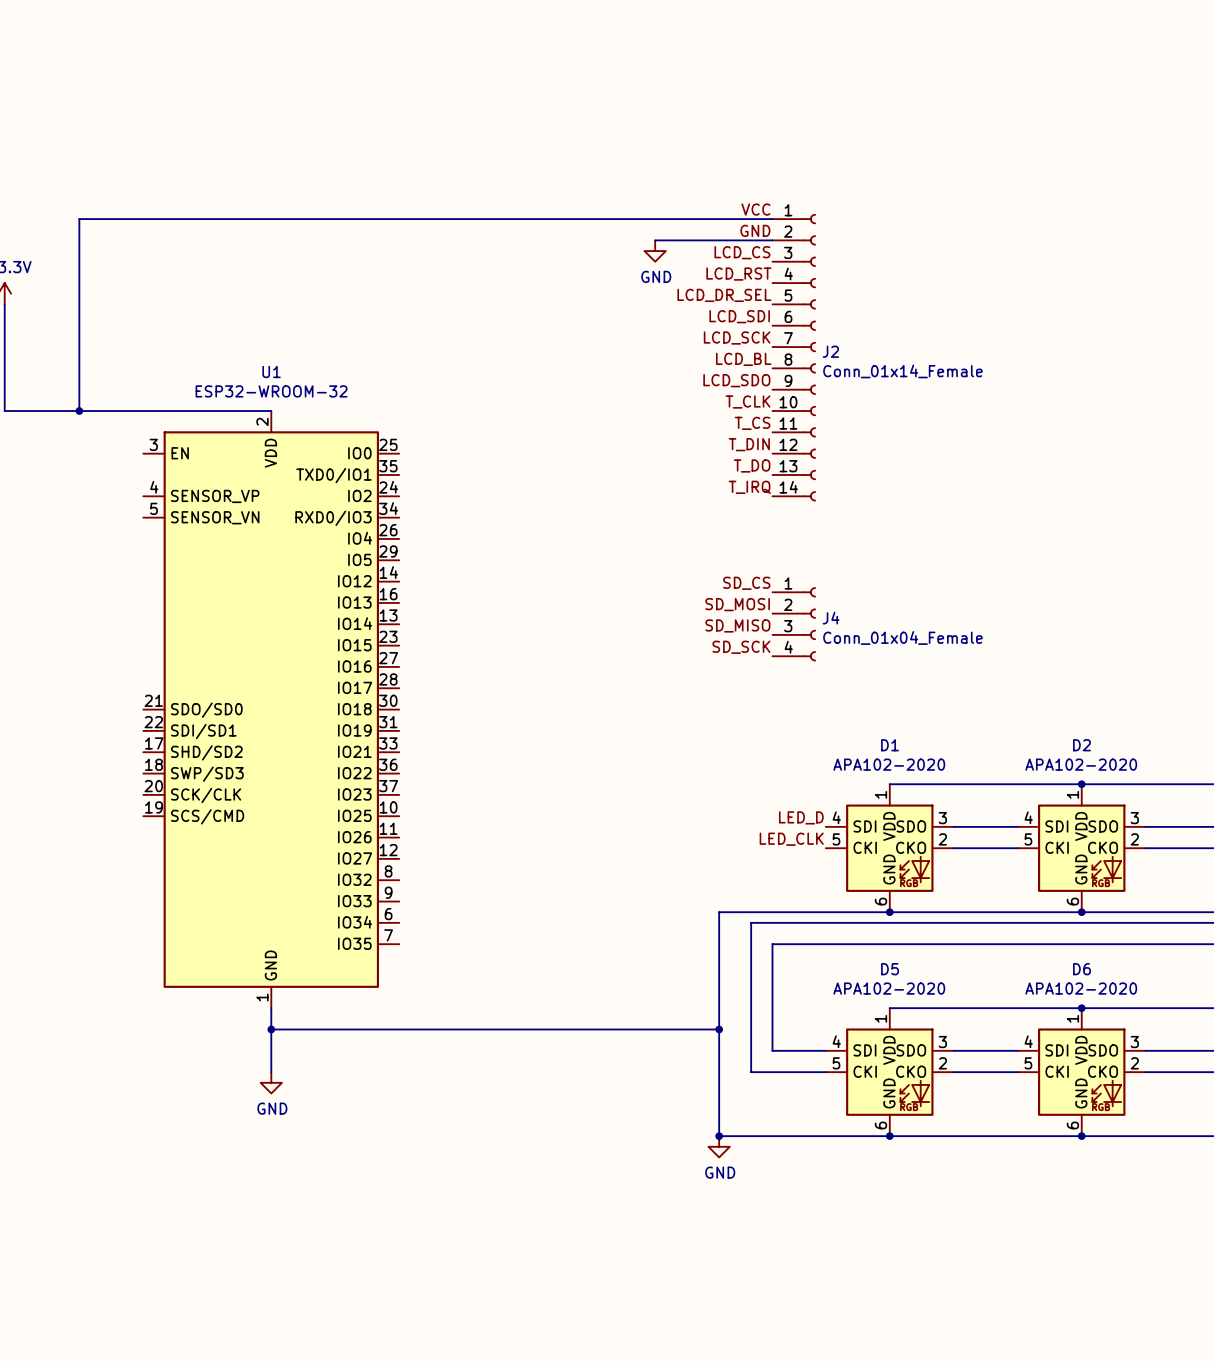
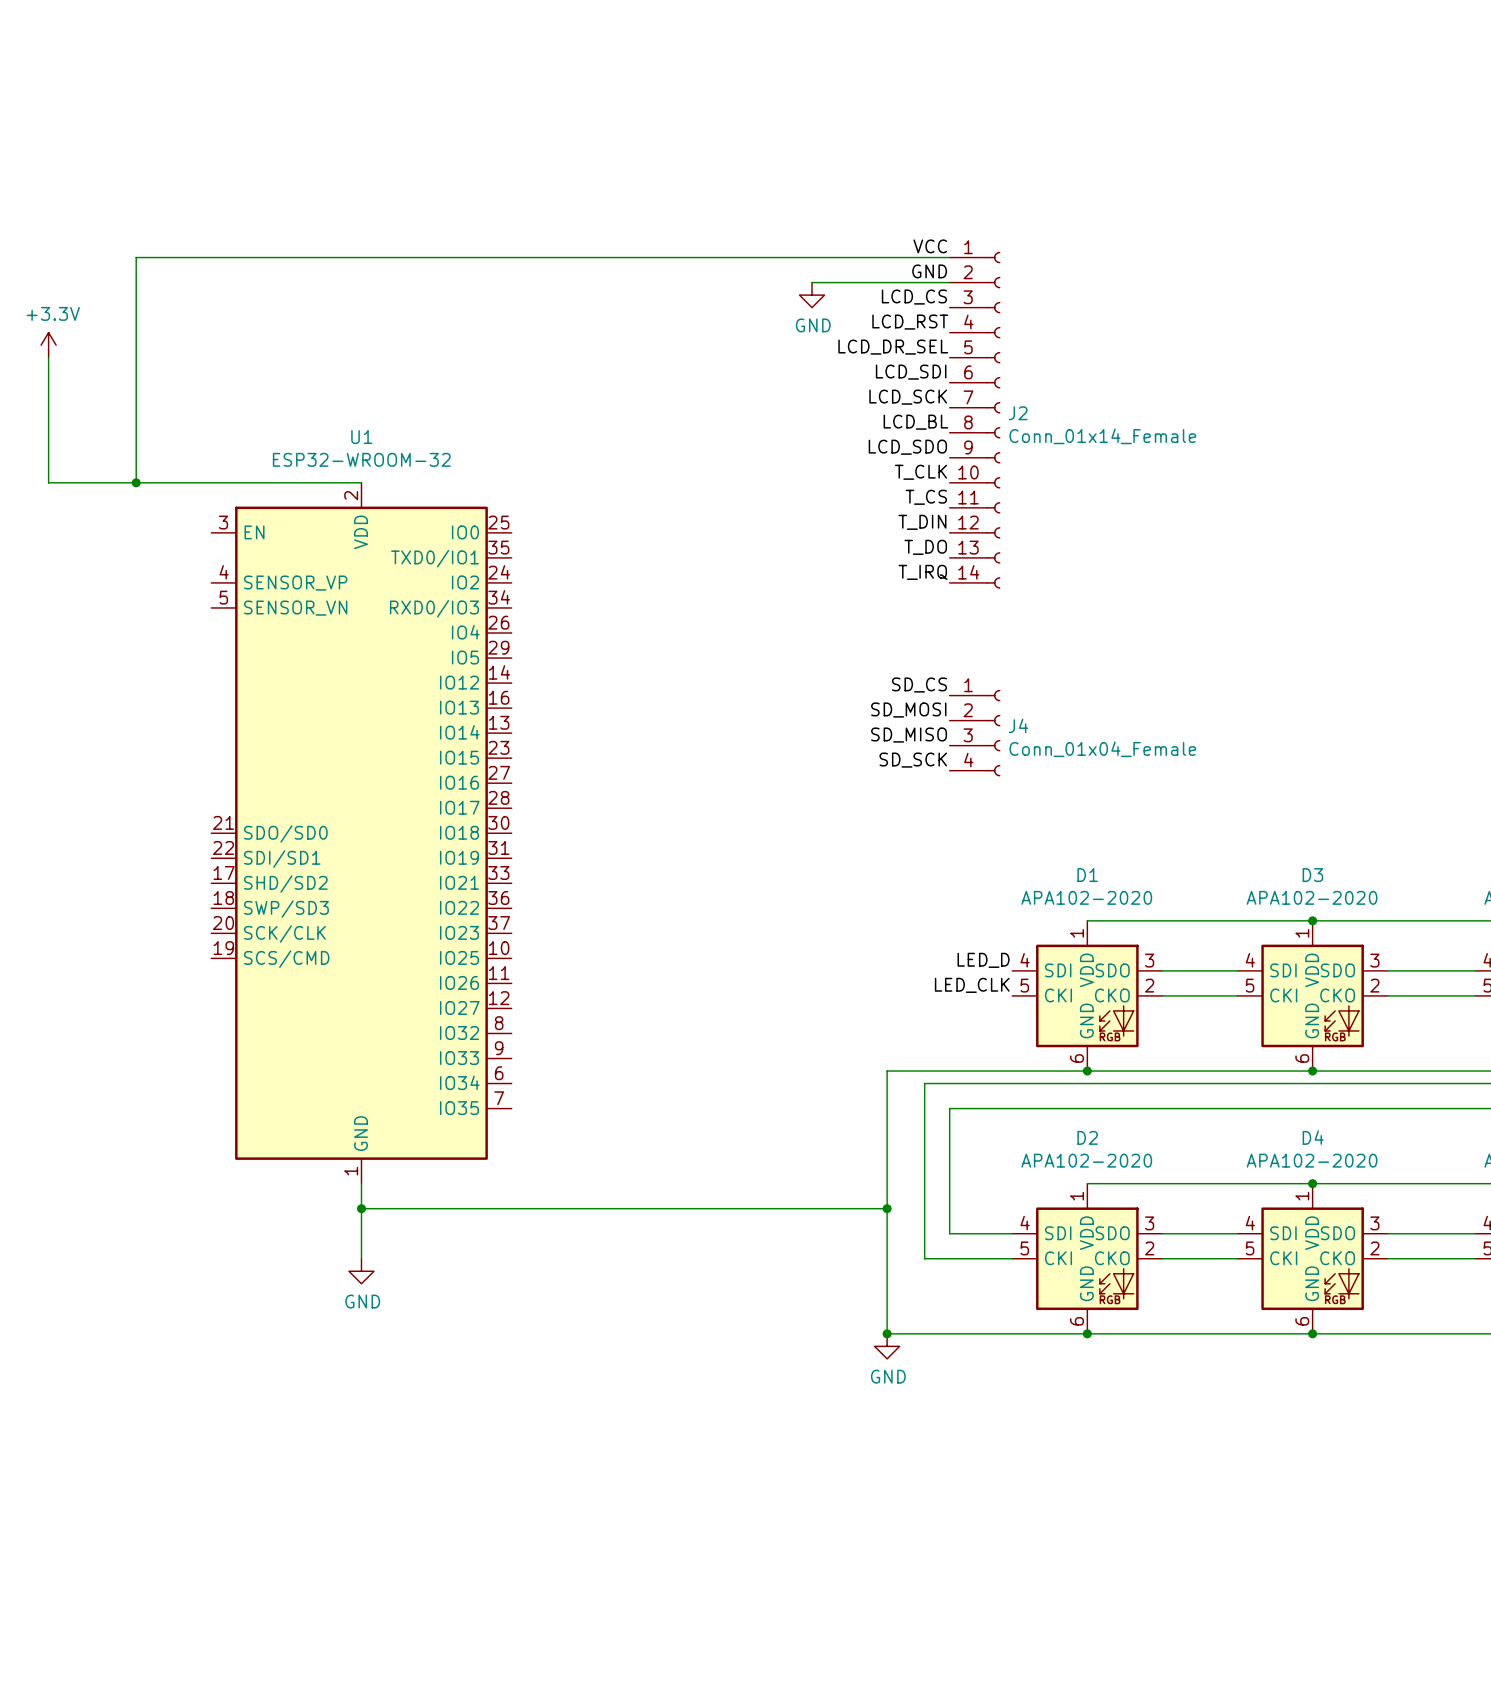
D2 name: D2 (1081, 745) -> D3 (1312, 875)
D5 name: D5 (890, 969) -> D2 (1087, 1137)
D6 name: D6 (1081, 969) -> D4 (1313, 1137)

